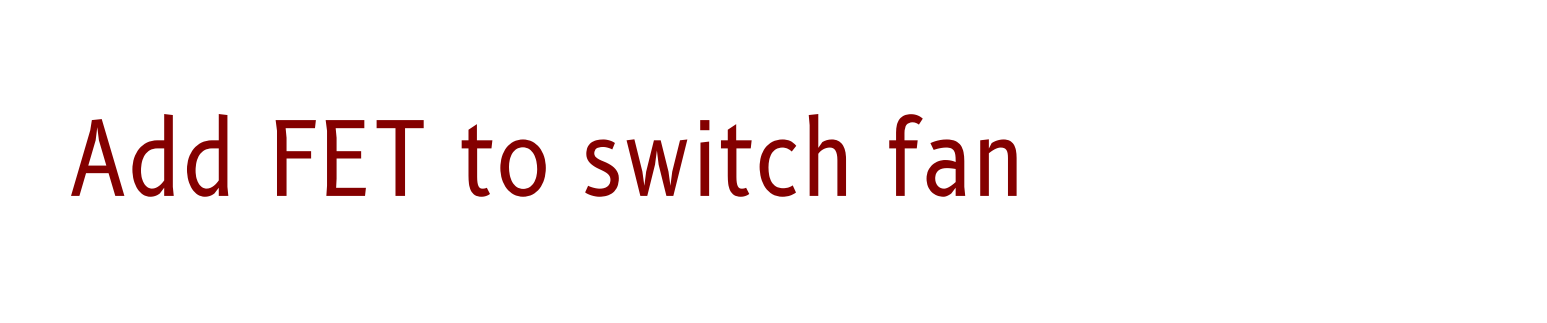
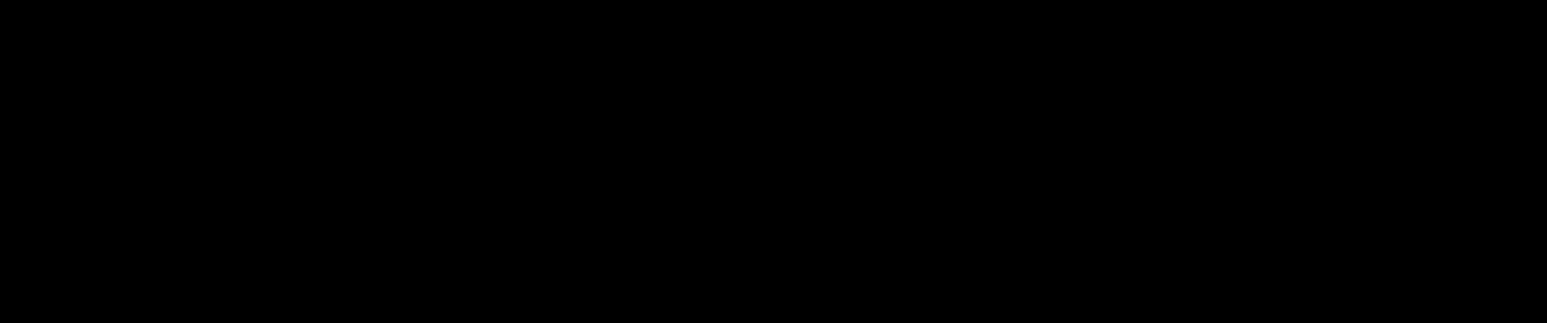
text: Add FET to switch fan (543, 155) -> none

